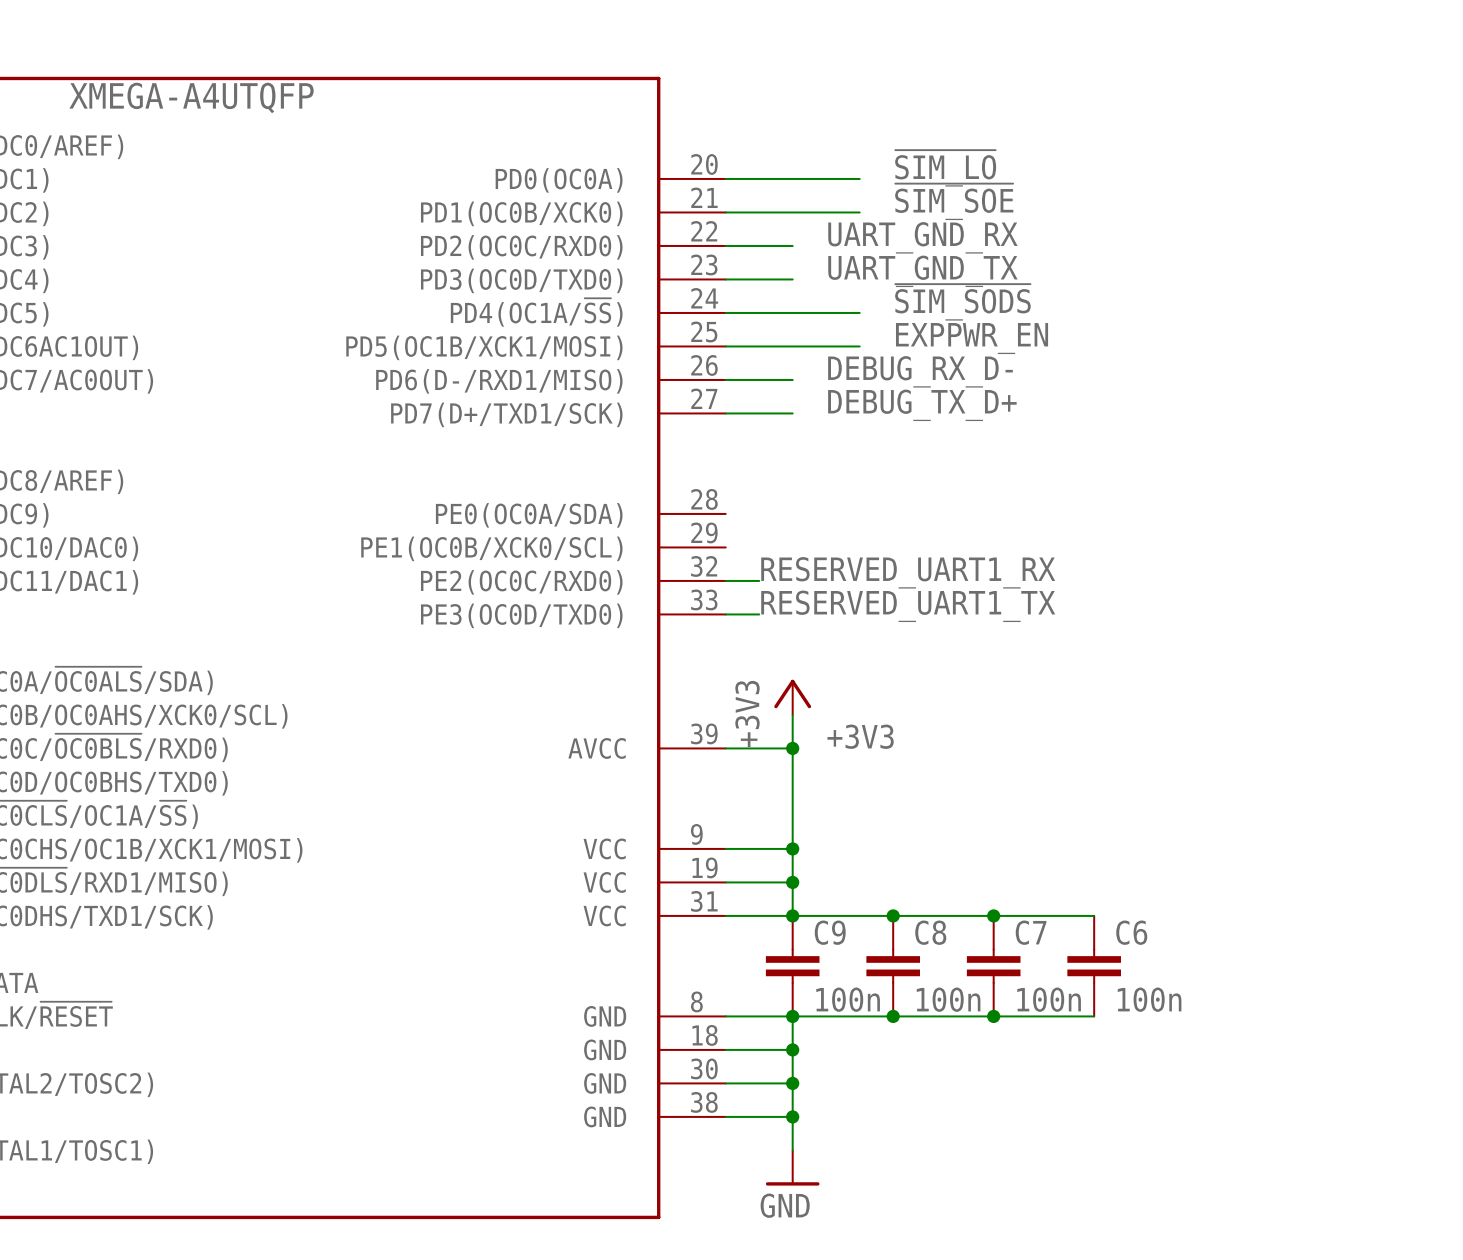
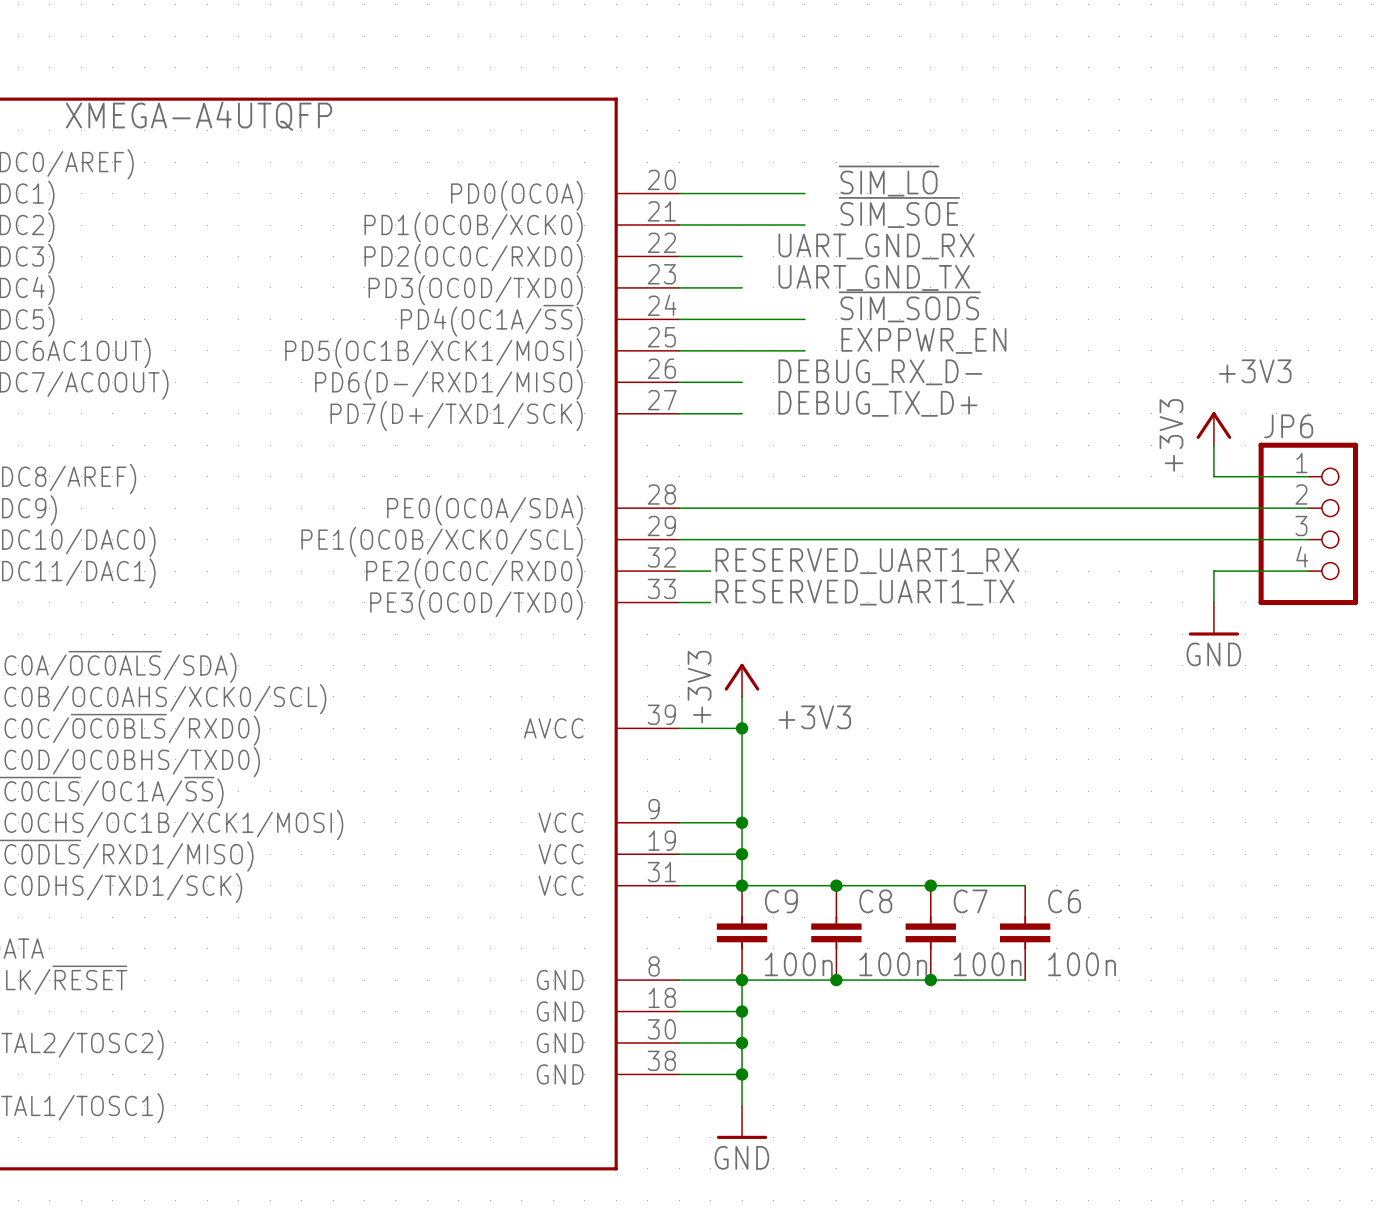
label: none -> +3V3 (1255, 371)
power symbol: none -> +3V3 (1213, 428)
wire: none -> (1213, 445) (1213, 476) (1308, 476)
wire: none -> (679, 508) (1308, 508)
JP6: none -> (1308, 523)
wire: none -> (679, 539) (1308, 539)
wire: none -> (1308, 571) (1213, 571) (1213, 602)
power symbol: none -> GND (1213, 619)

